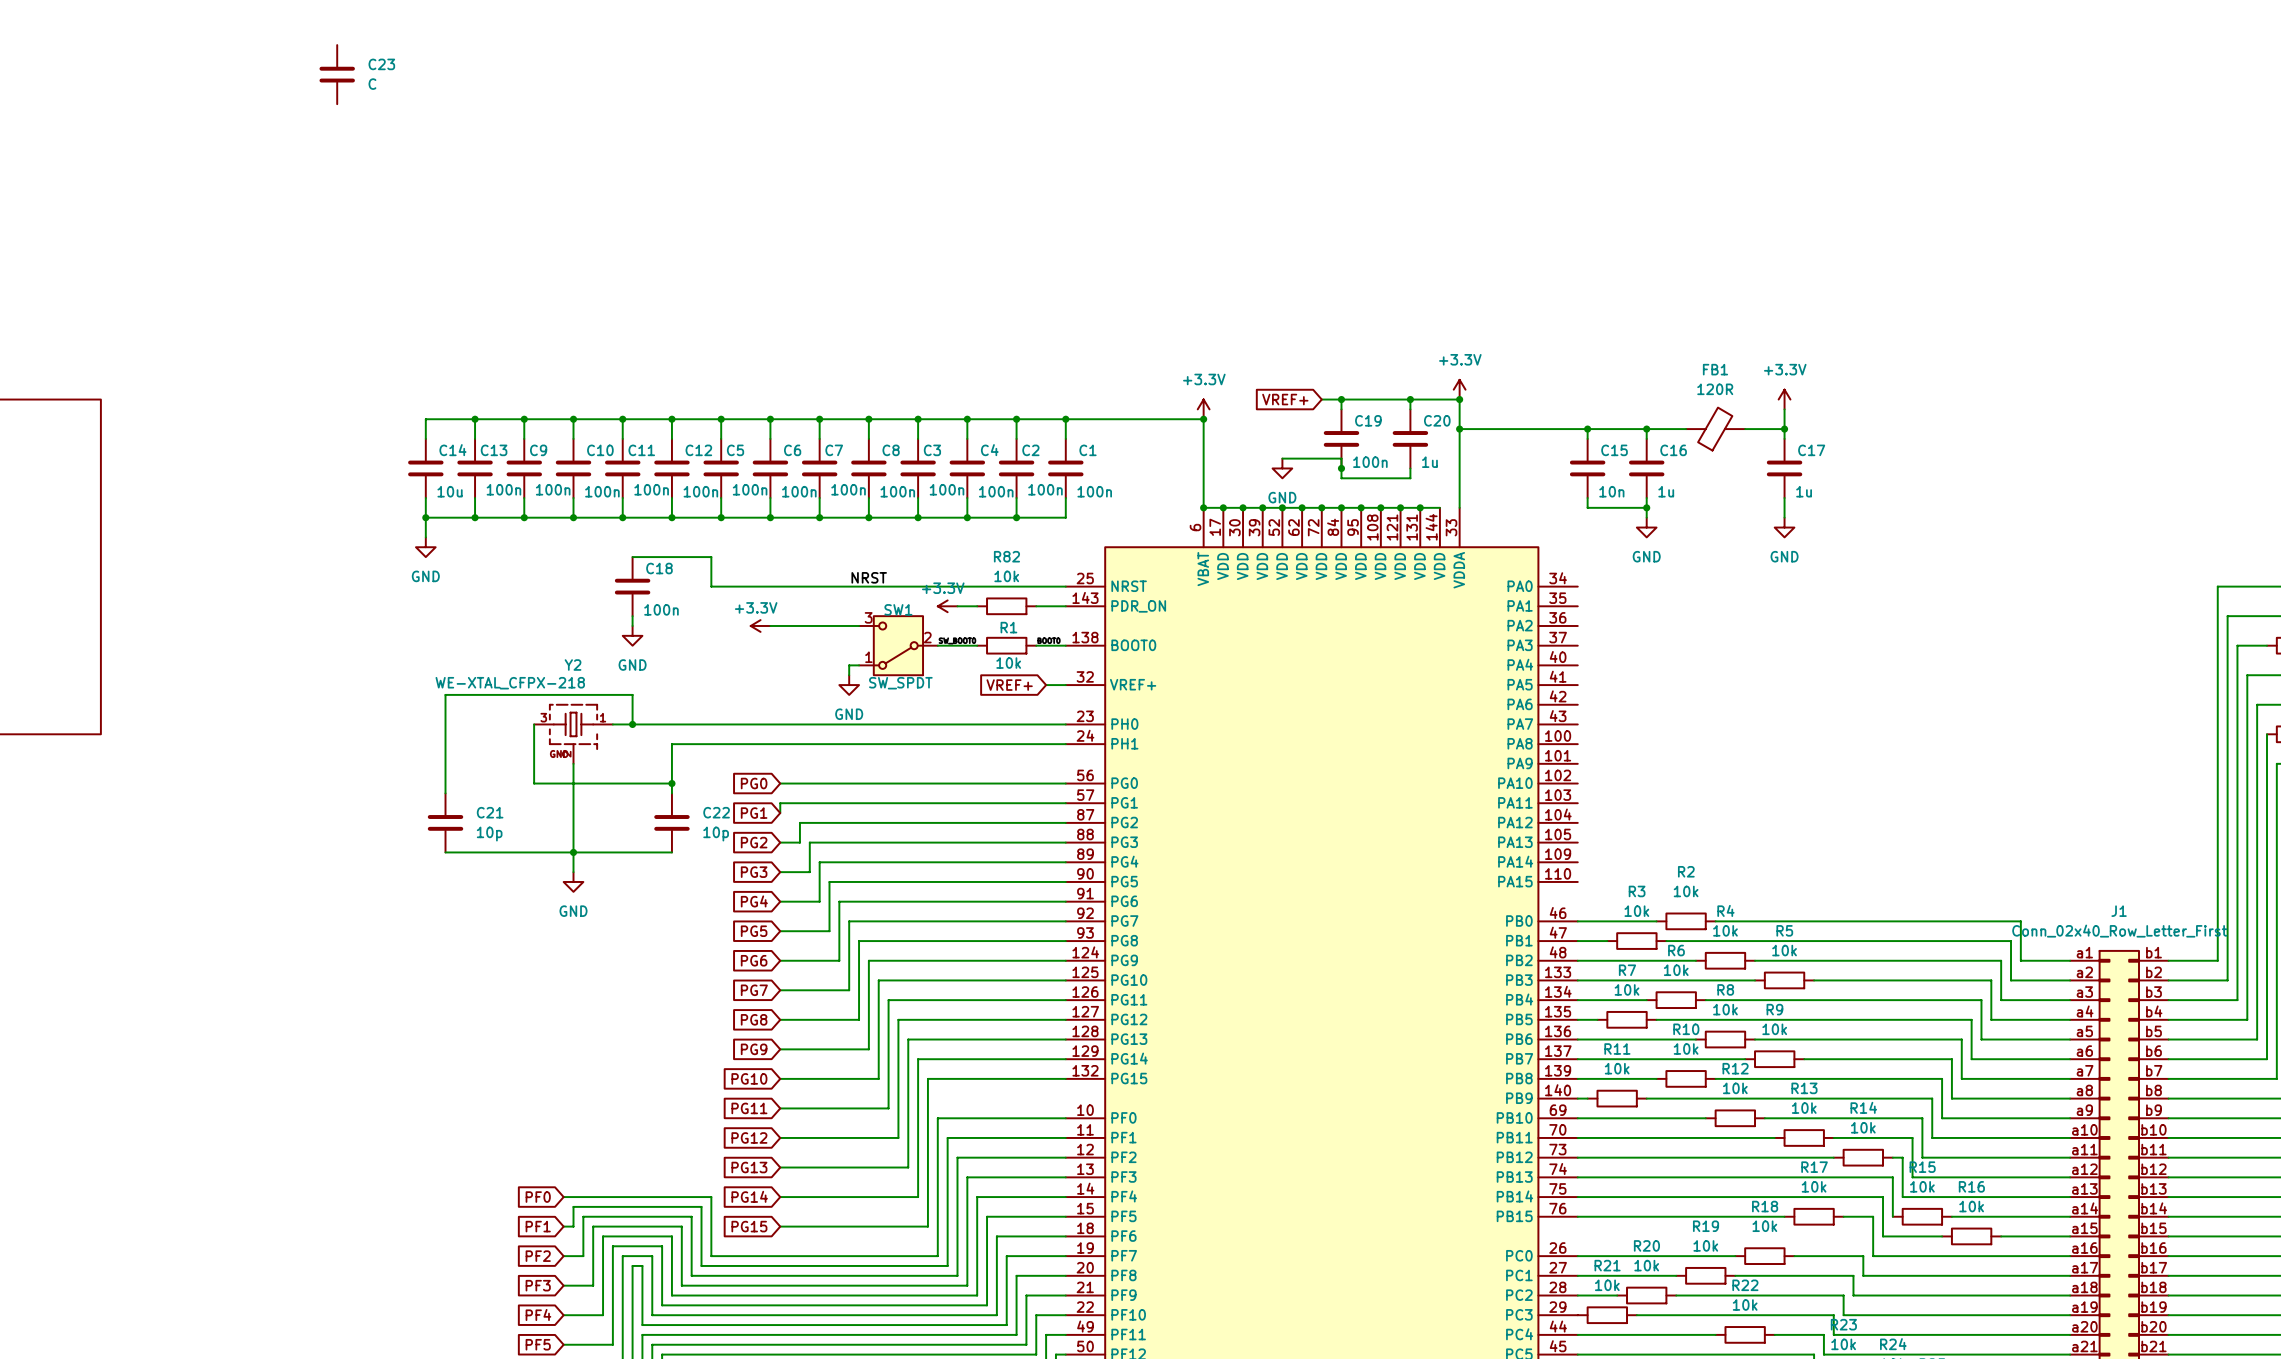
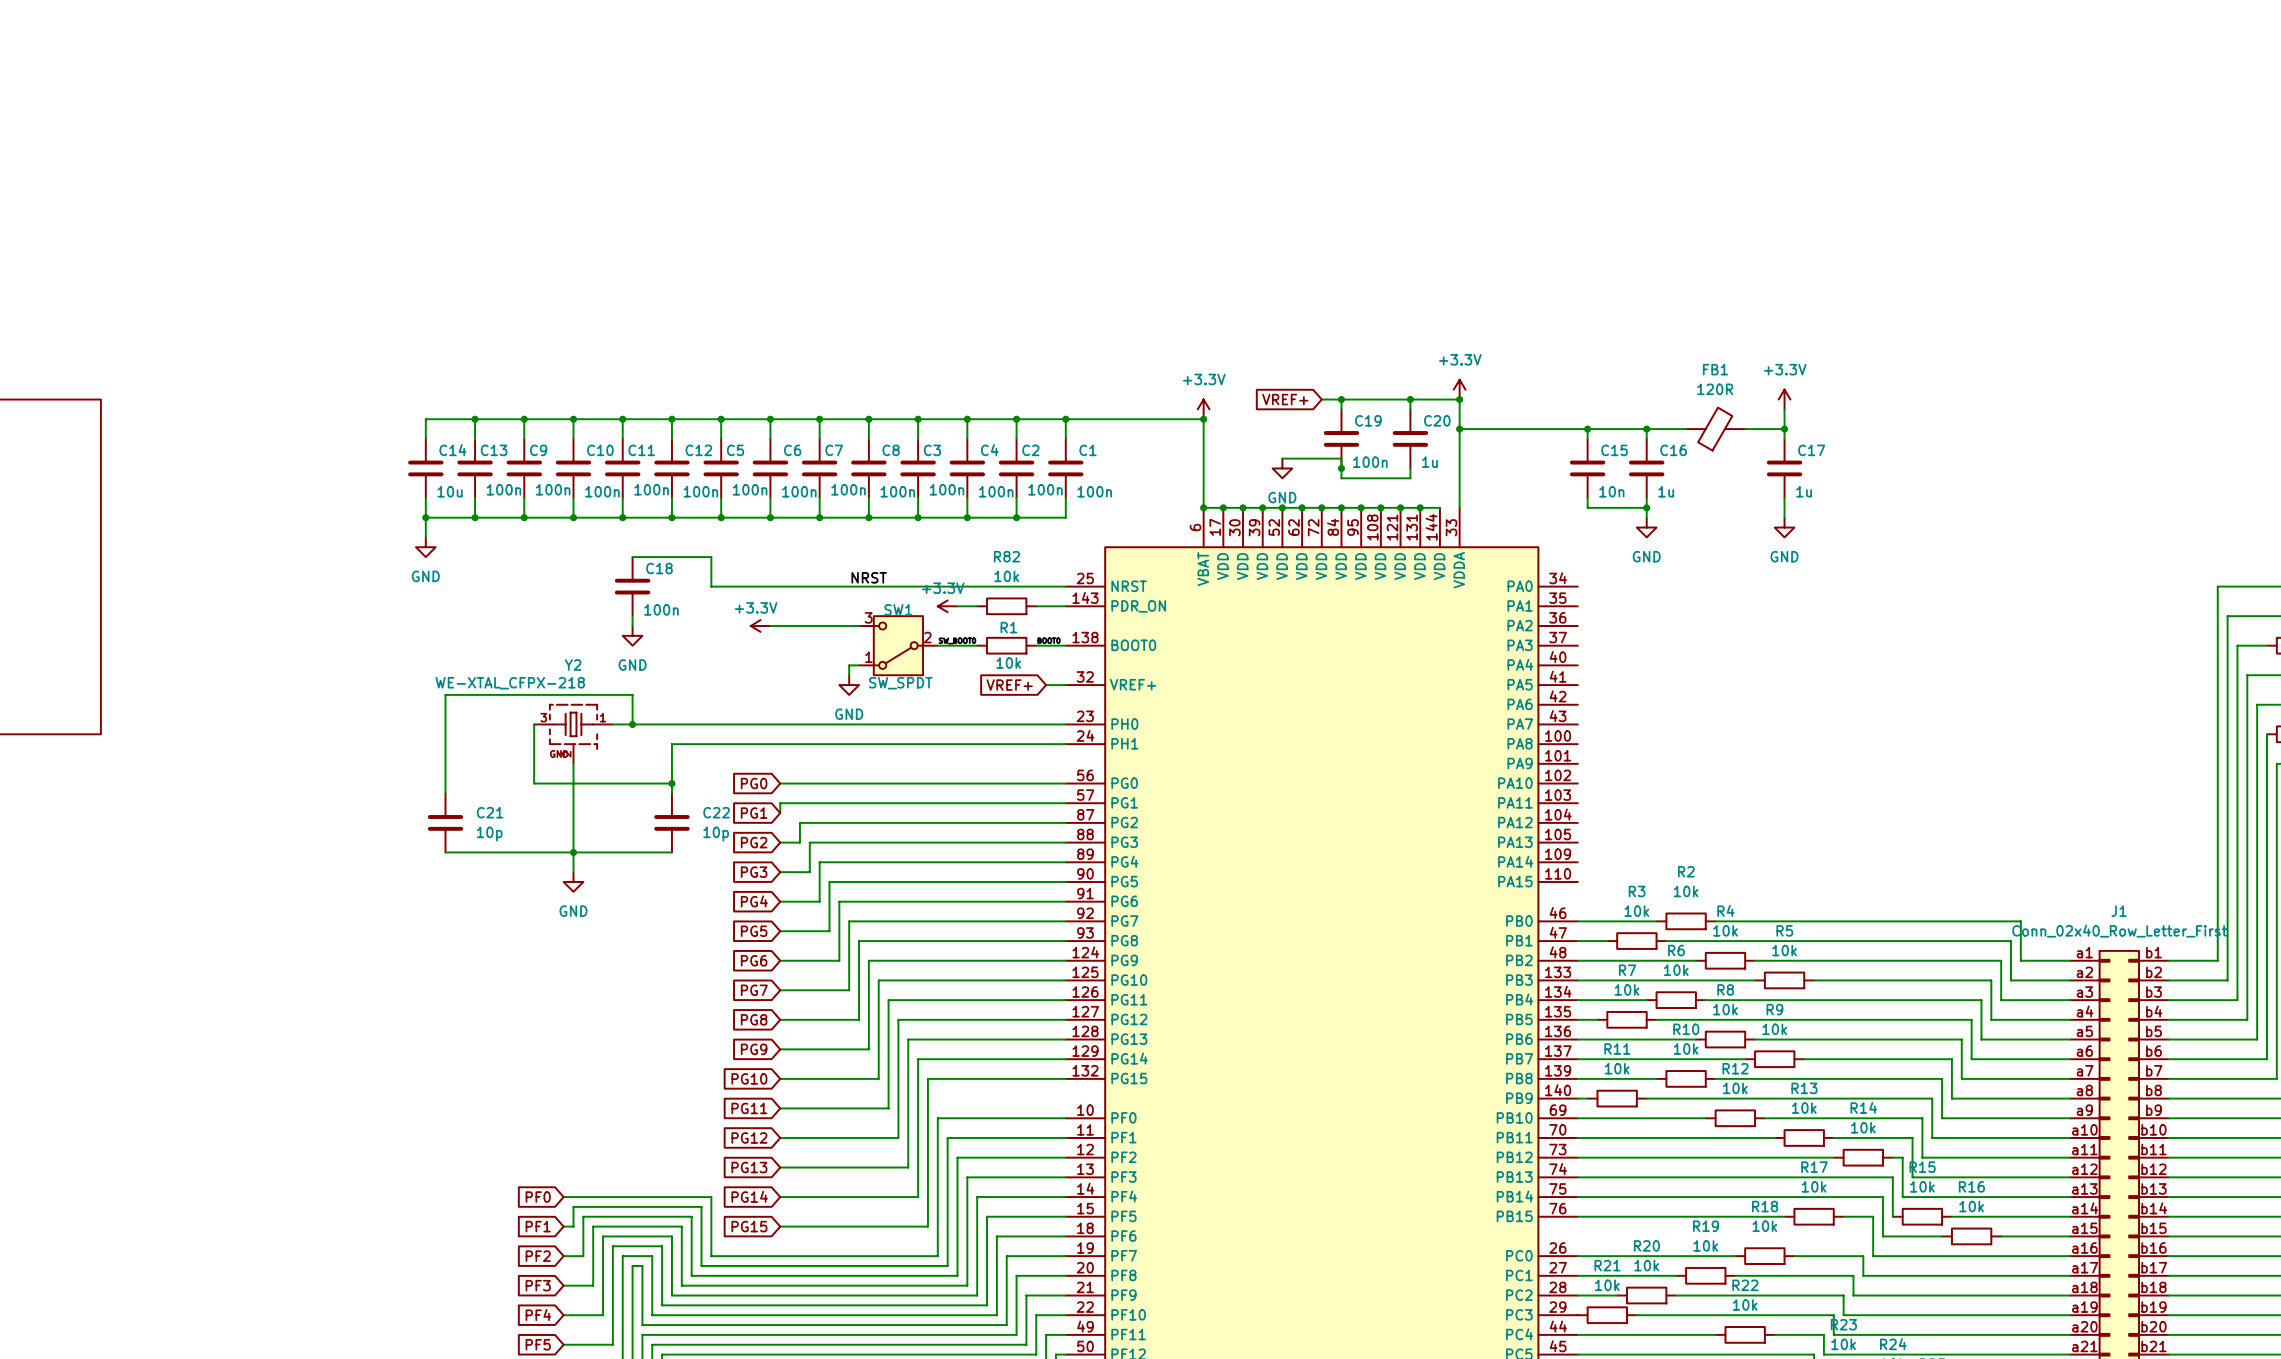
C23: C (337, 74) -> none

